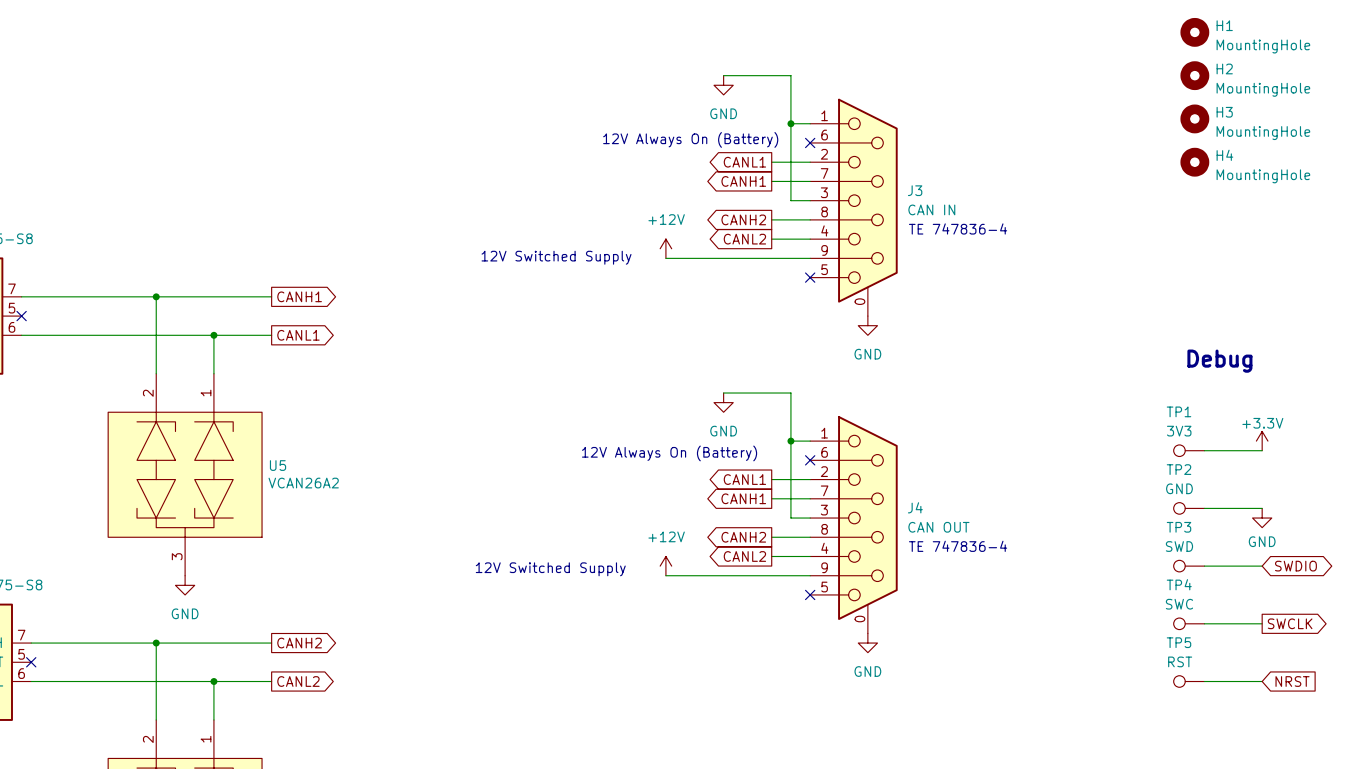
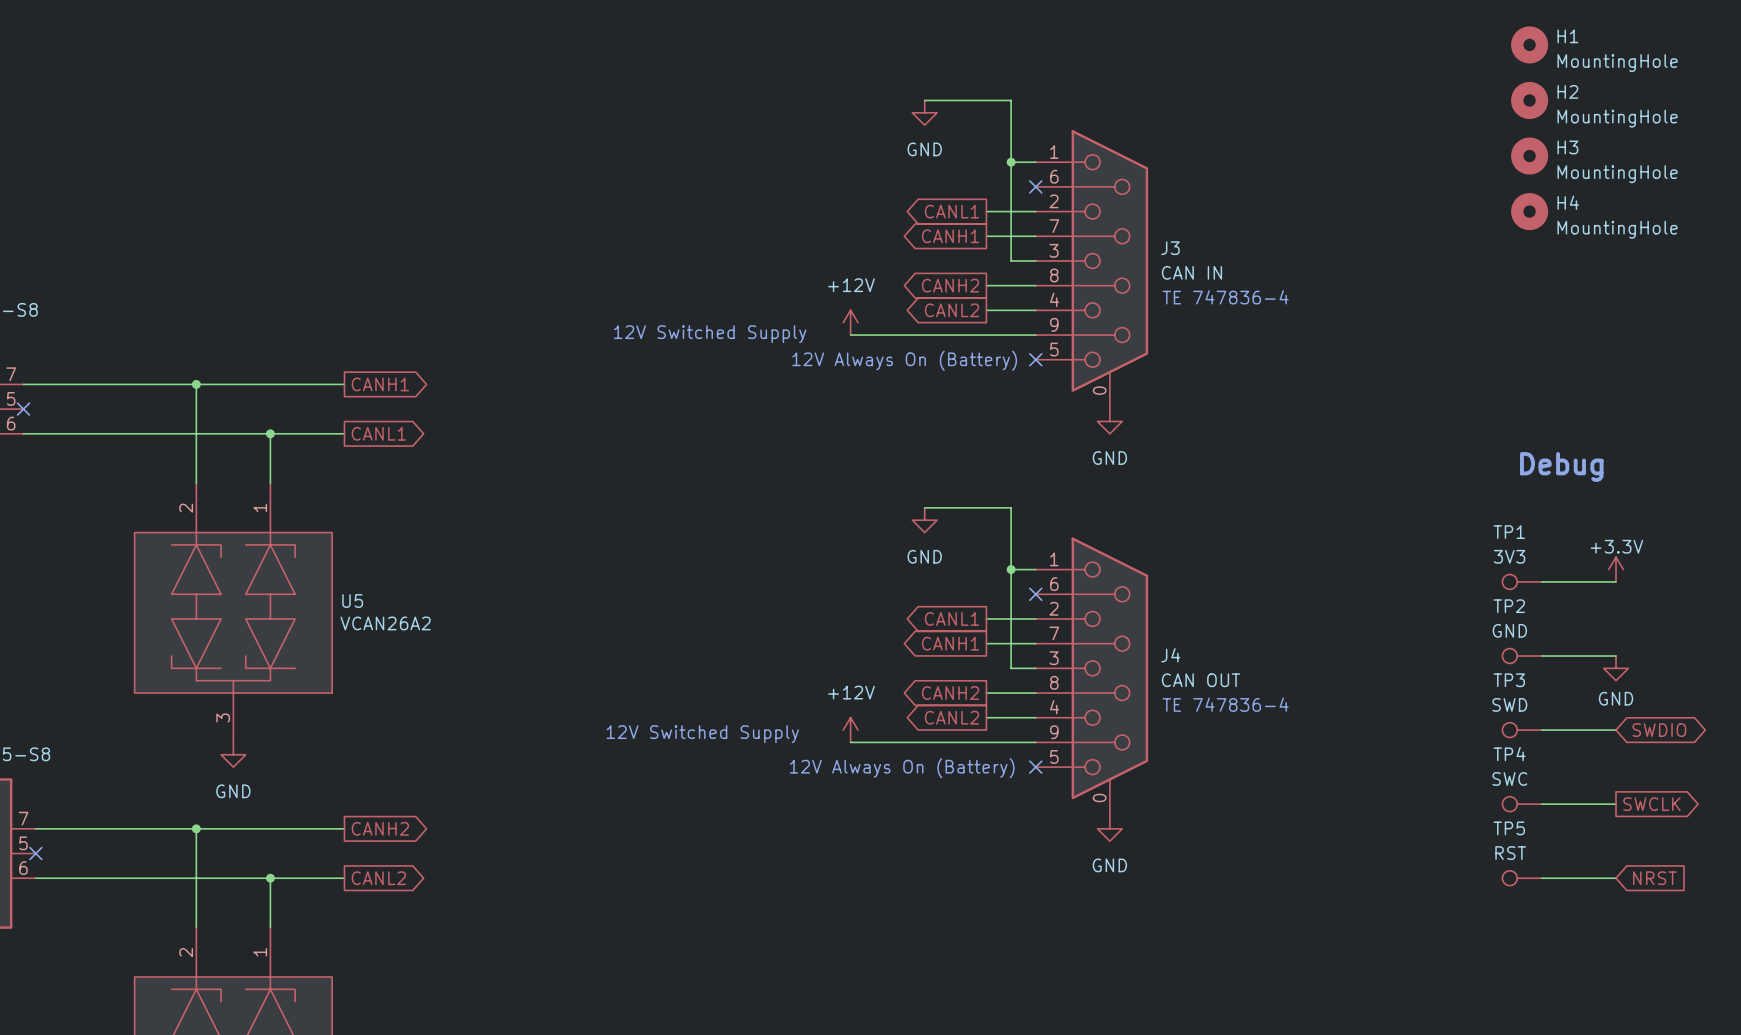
text: 12V Always On (Battery) (690, 139) -> none
text: none -> 12V Always On (Battery) (904, 360)
text: 12V Always On (Battery) (669, 453) -> none
text: none -> 12V Always On (Battery) (902, 768)

